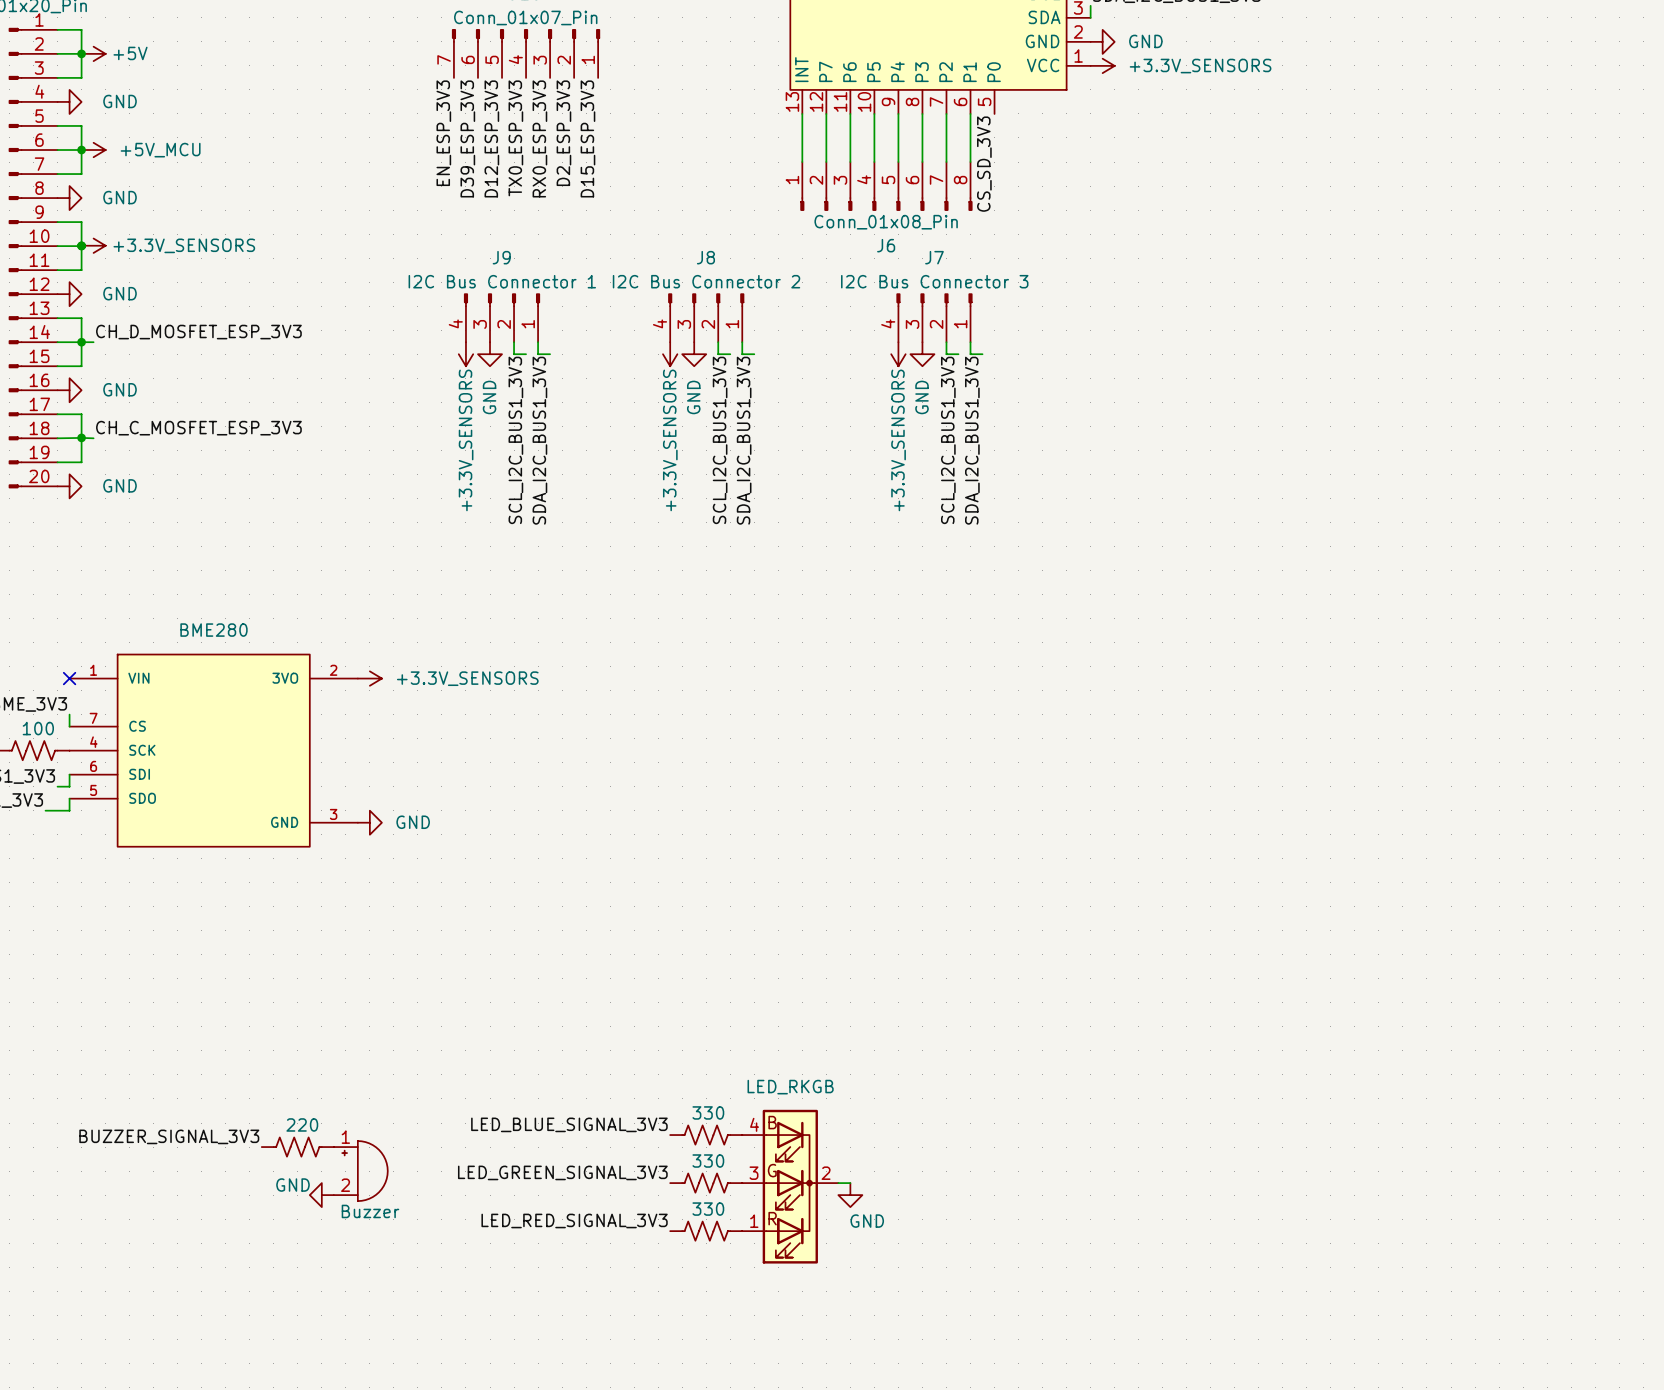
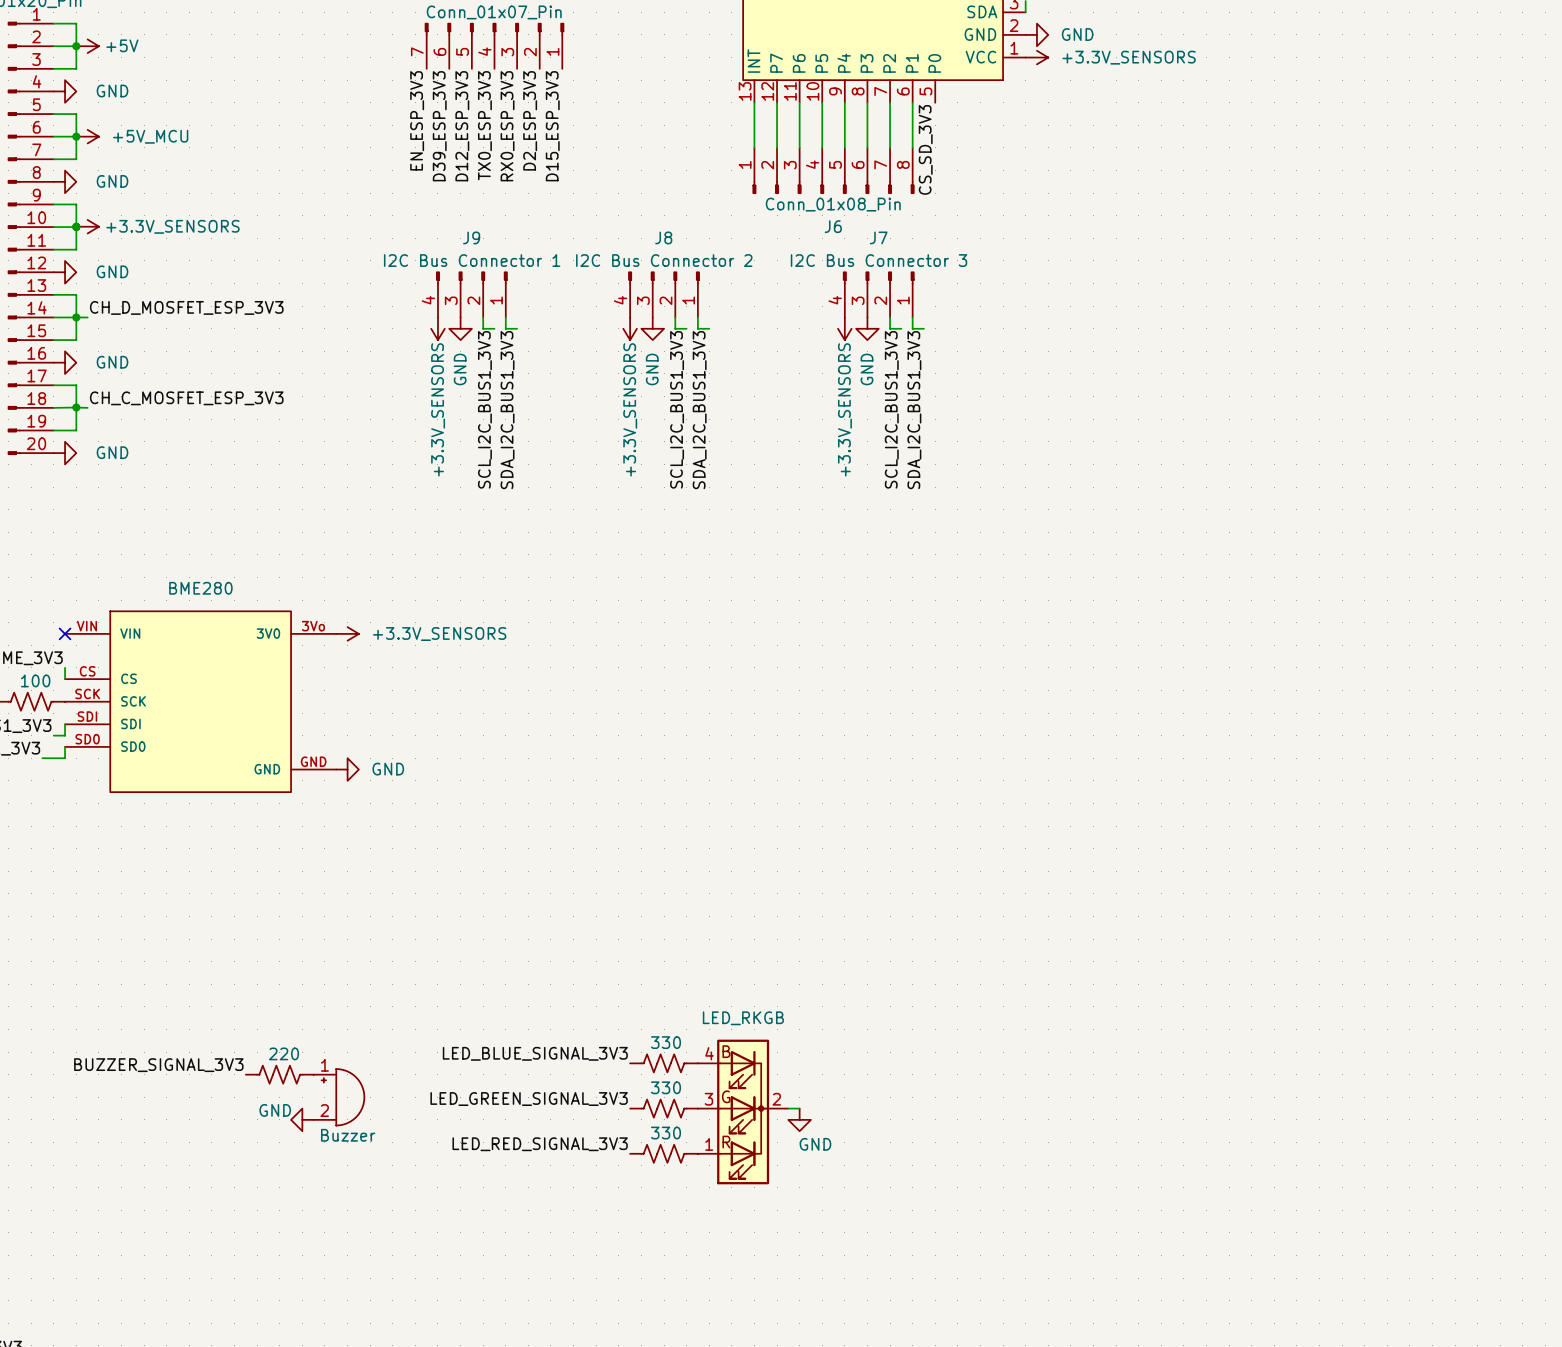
part symbol: [69, 654, 358, 847] -> [65, 611, 337, 793]

